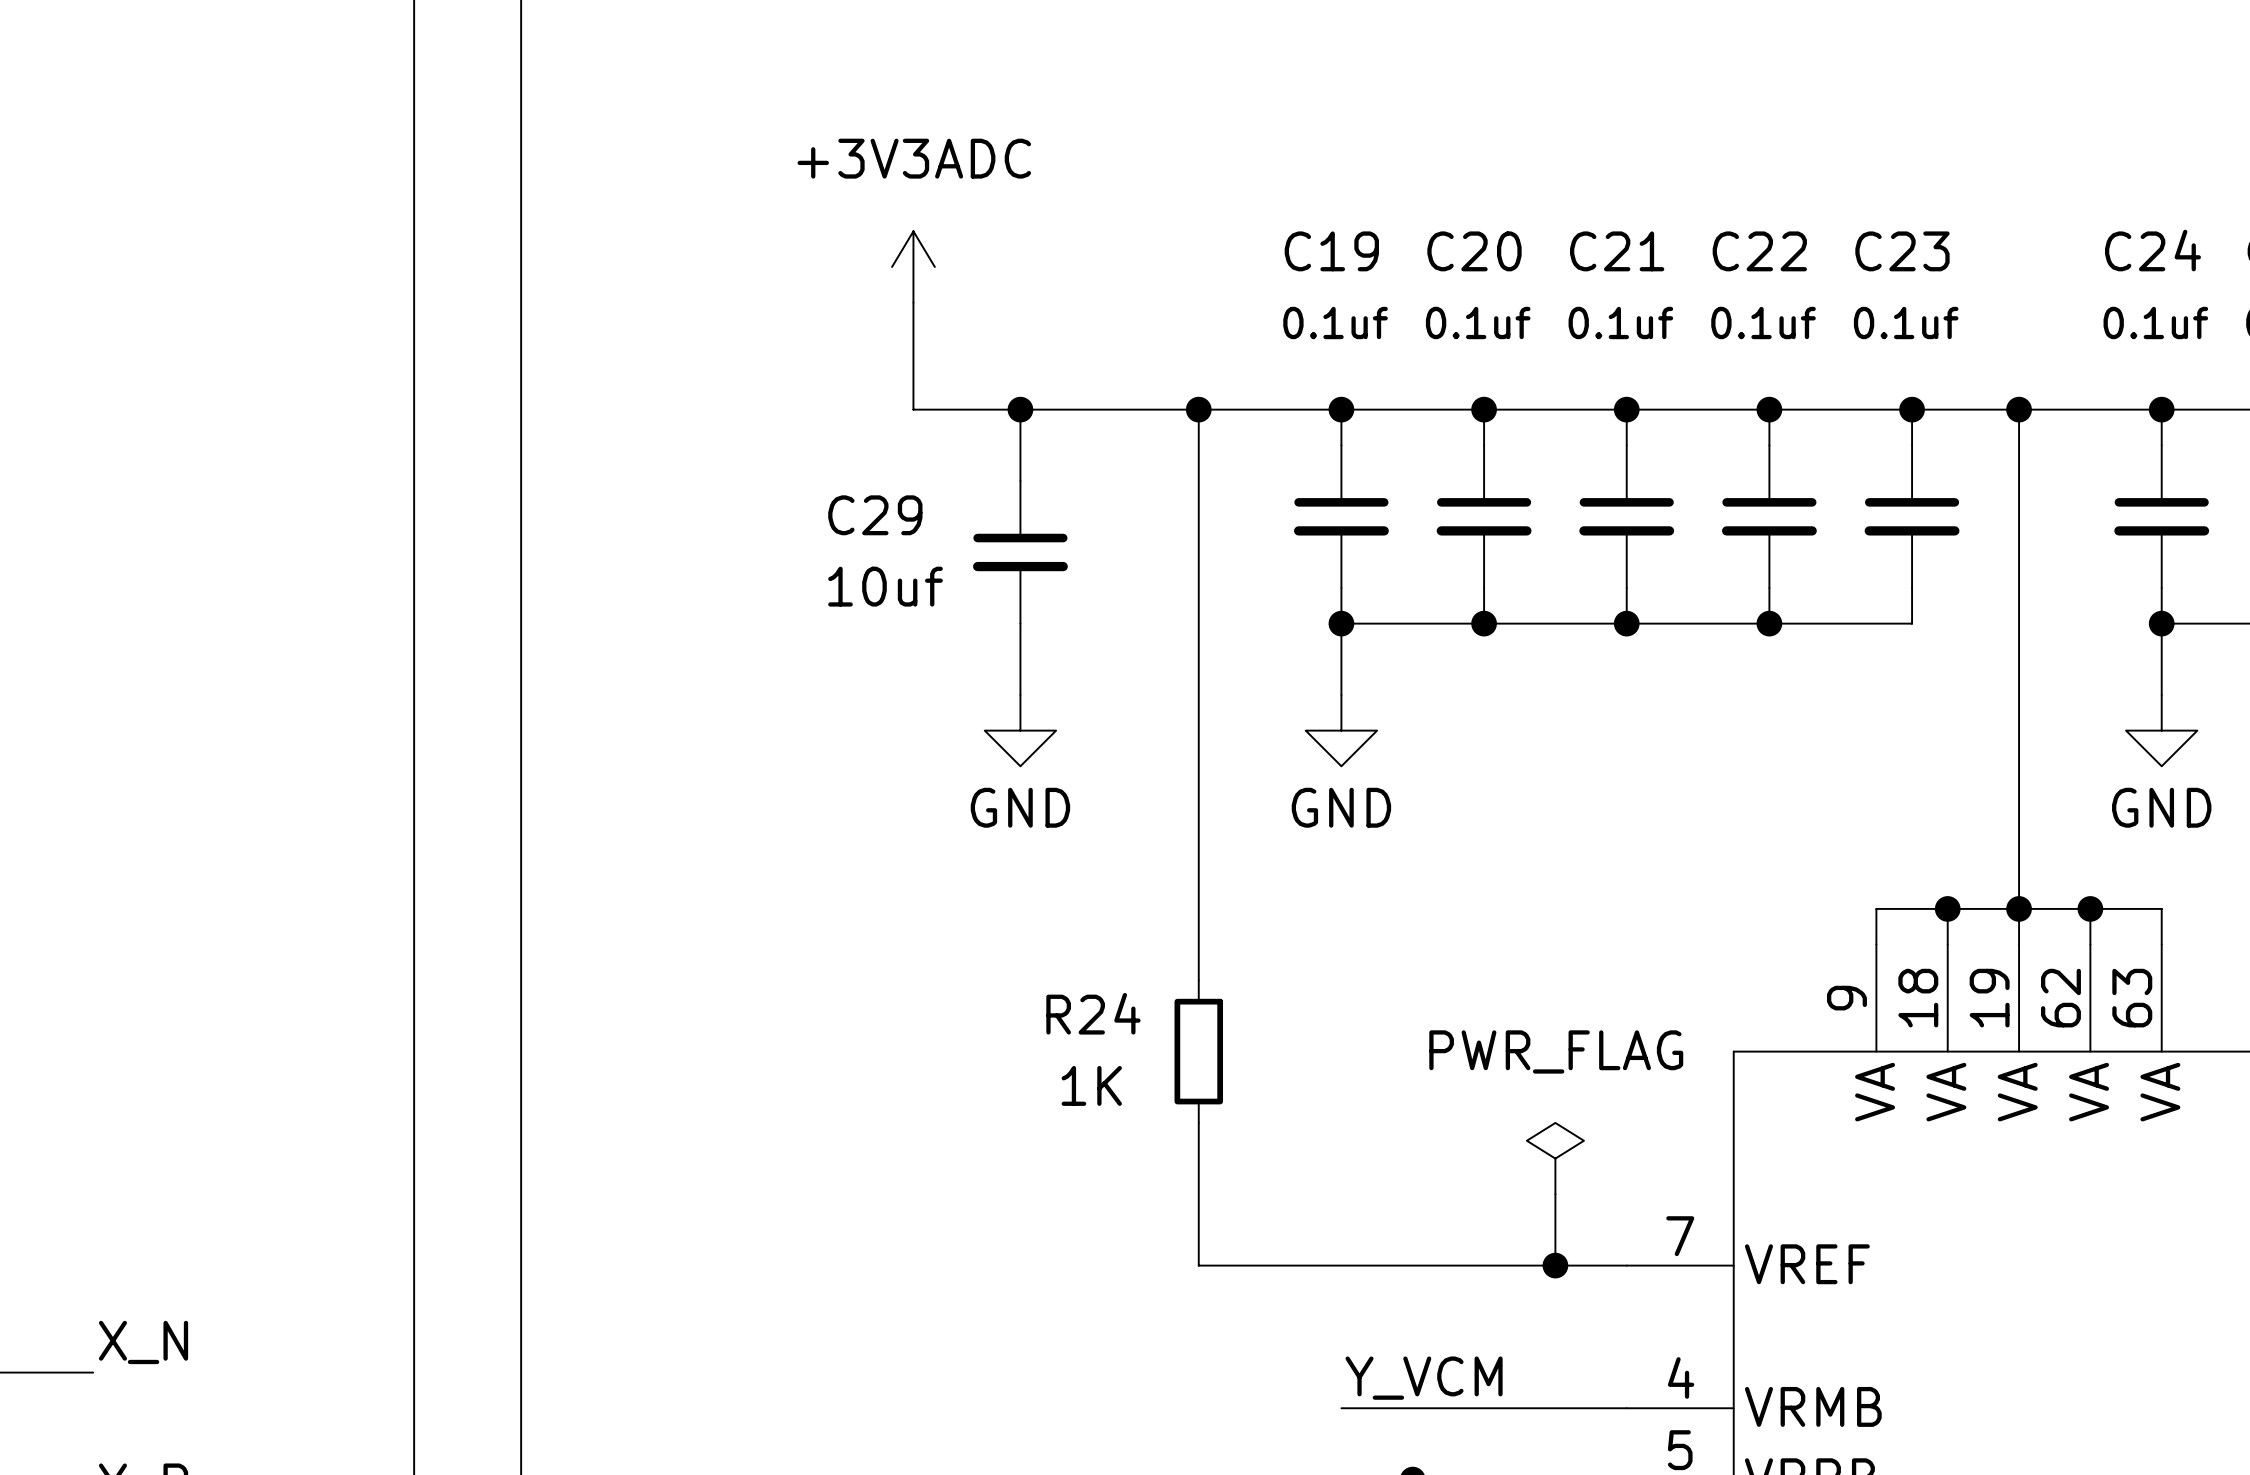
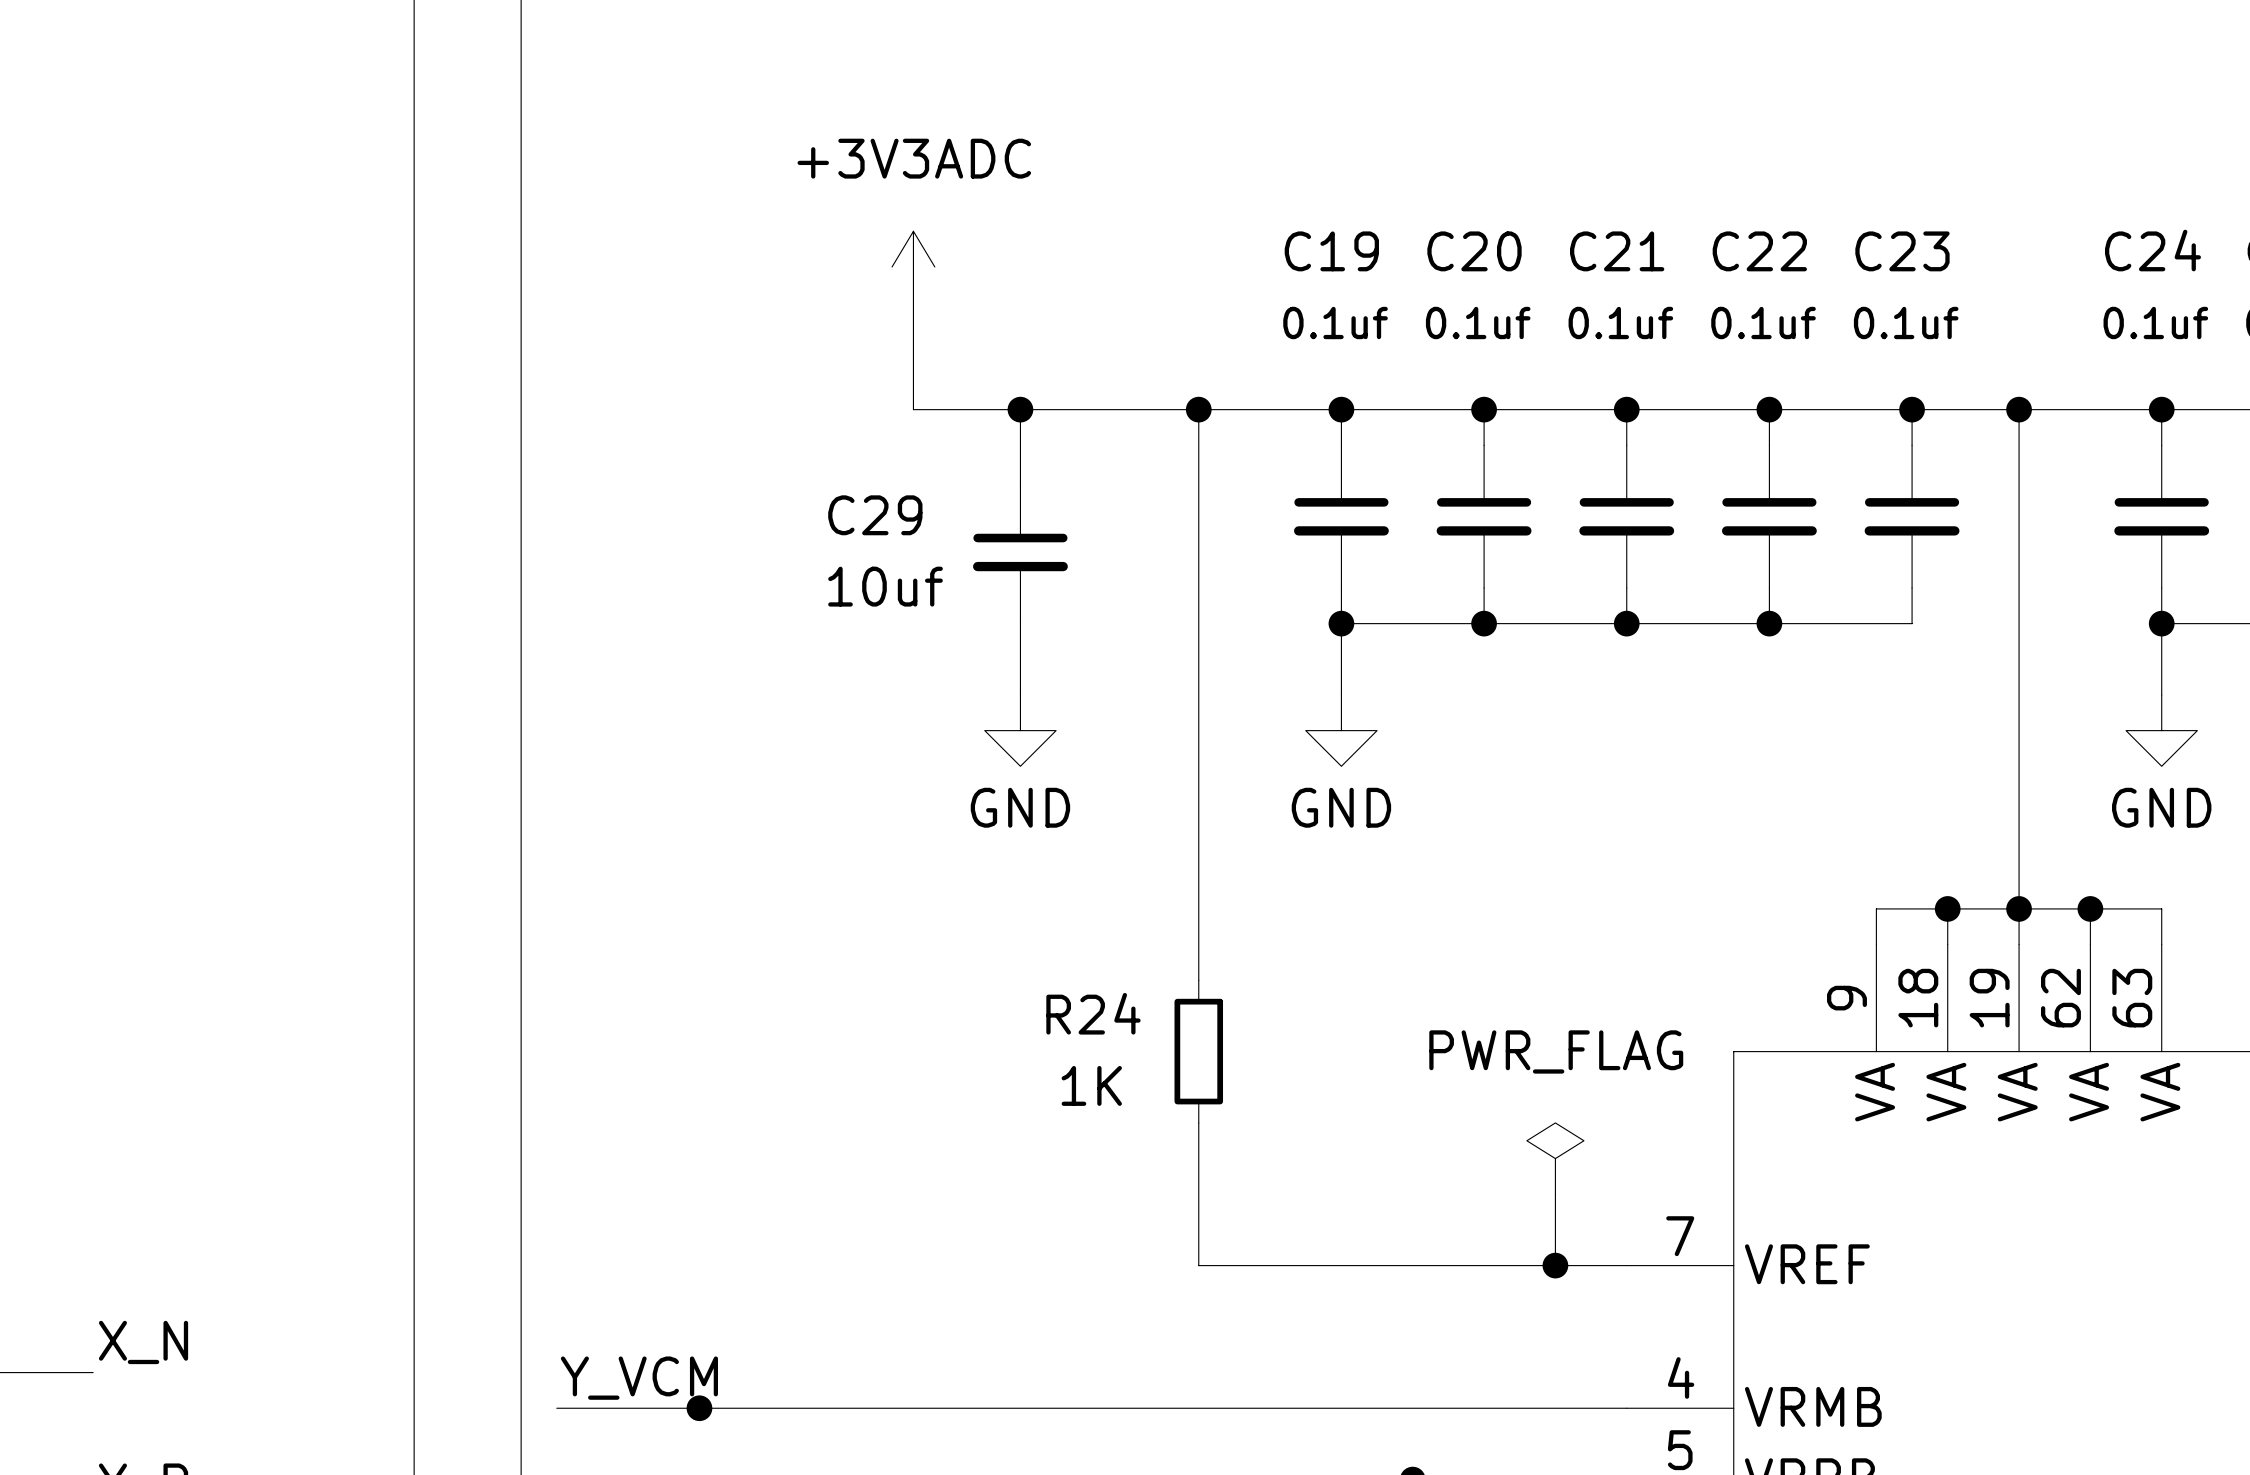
label: none -> Y_VCM (639, 1378)
label: Y_VCM (1424, 1378) -> none
wire: none -> (556, 1408) (1341, 1408)
junction: none -> (699, 1408)

